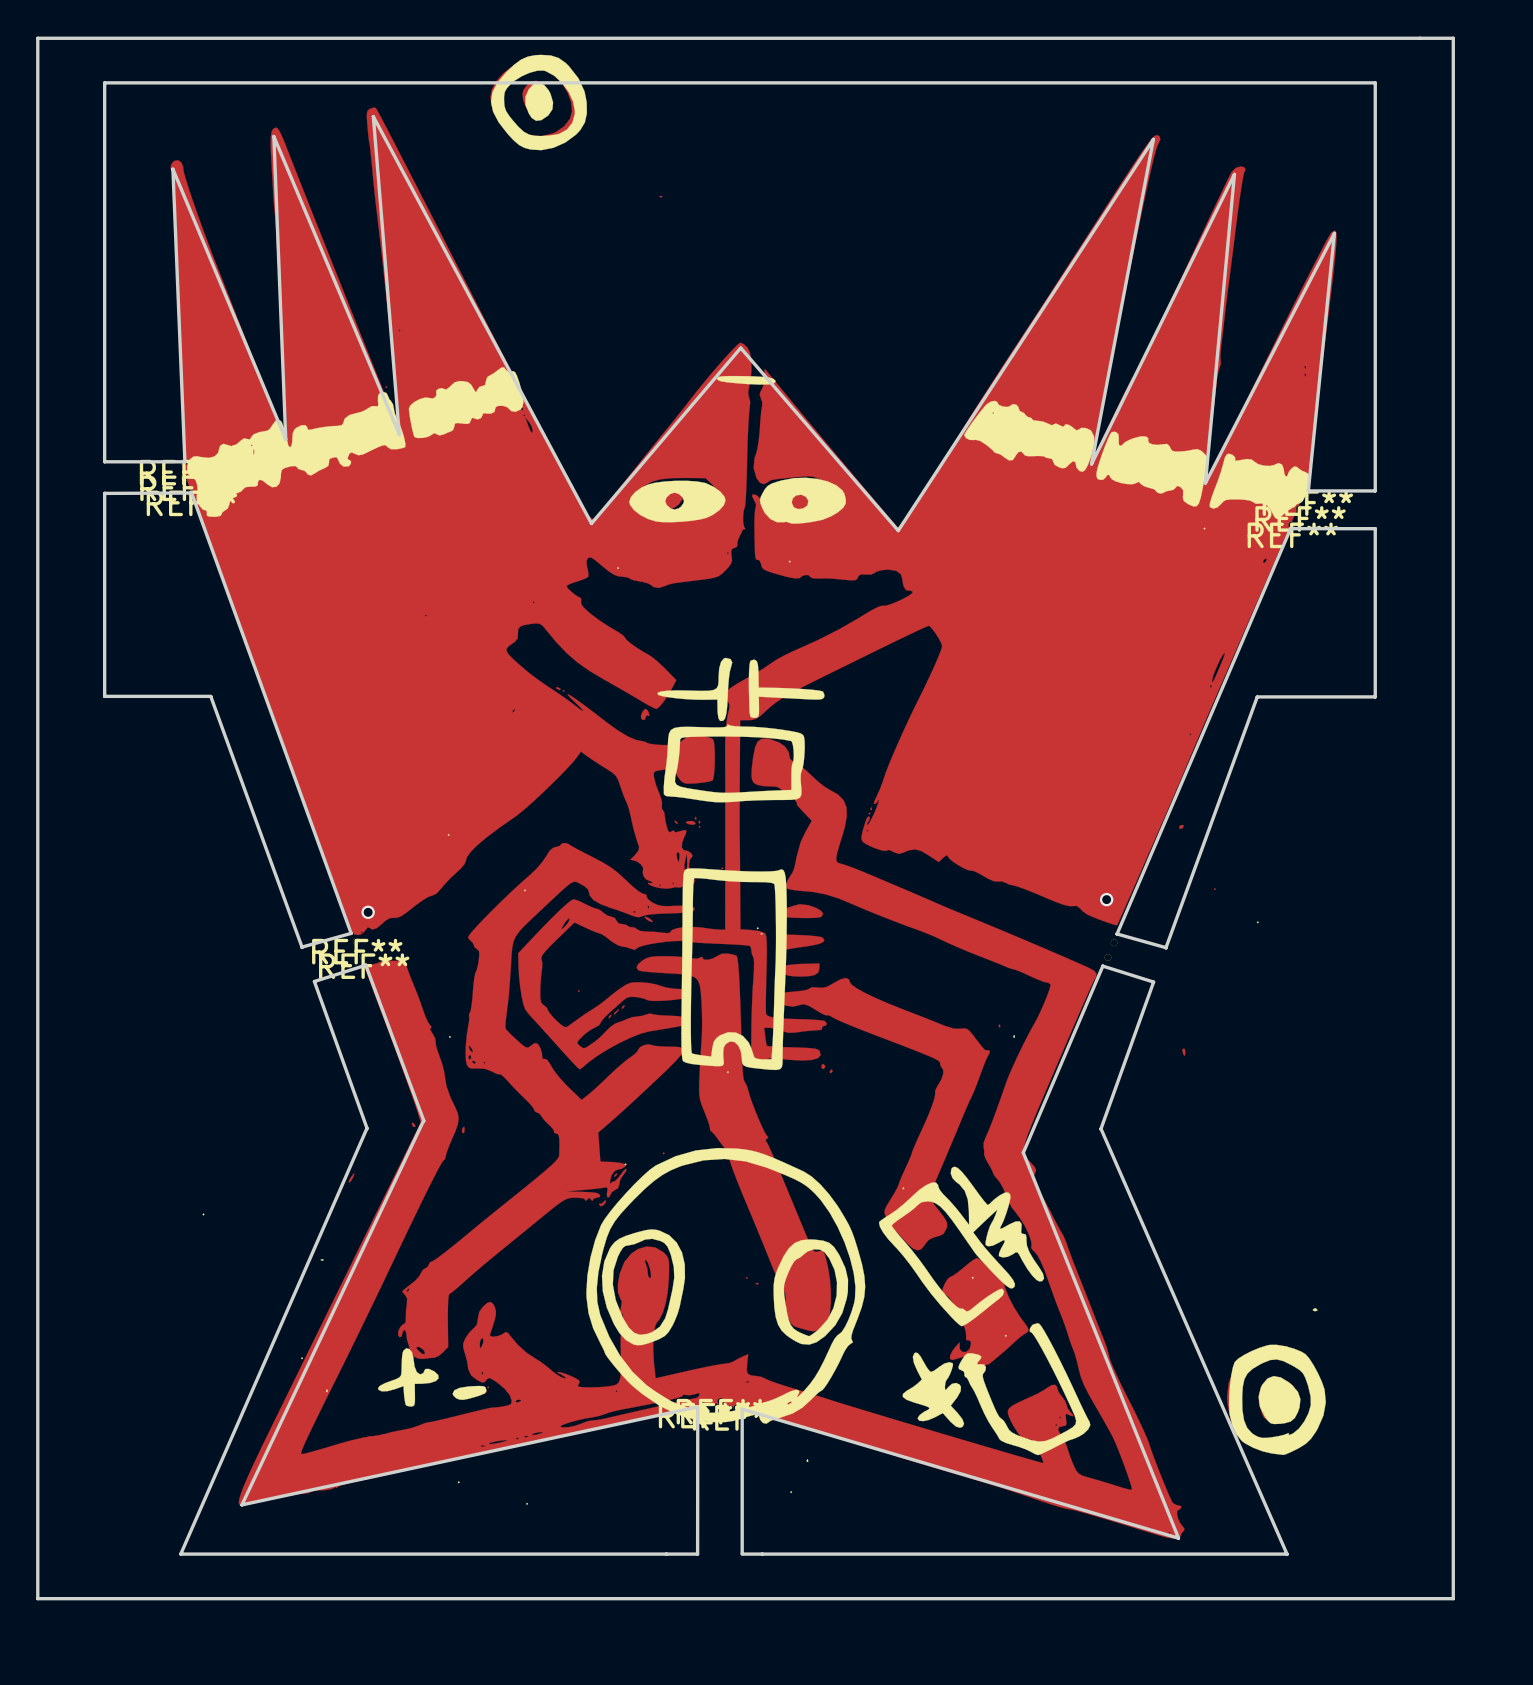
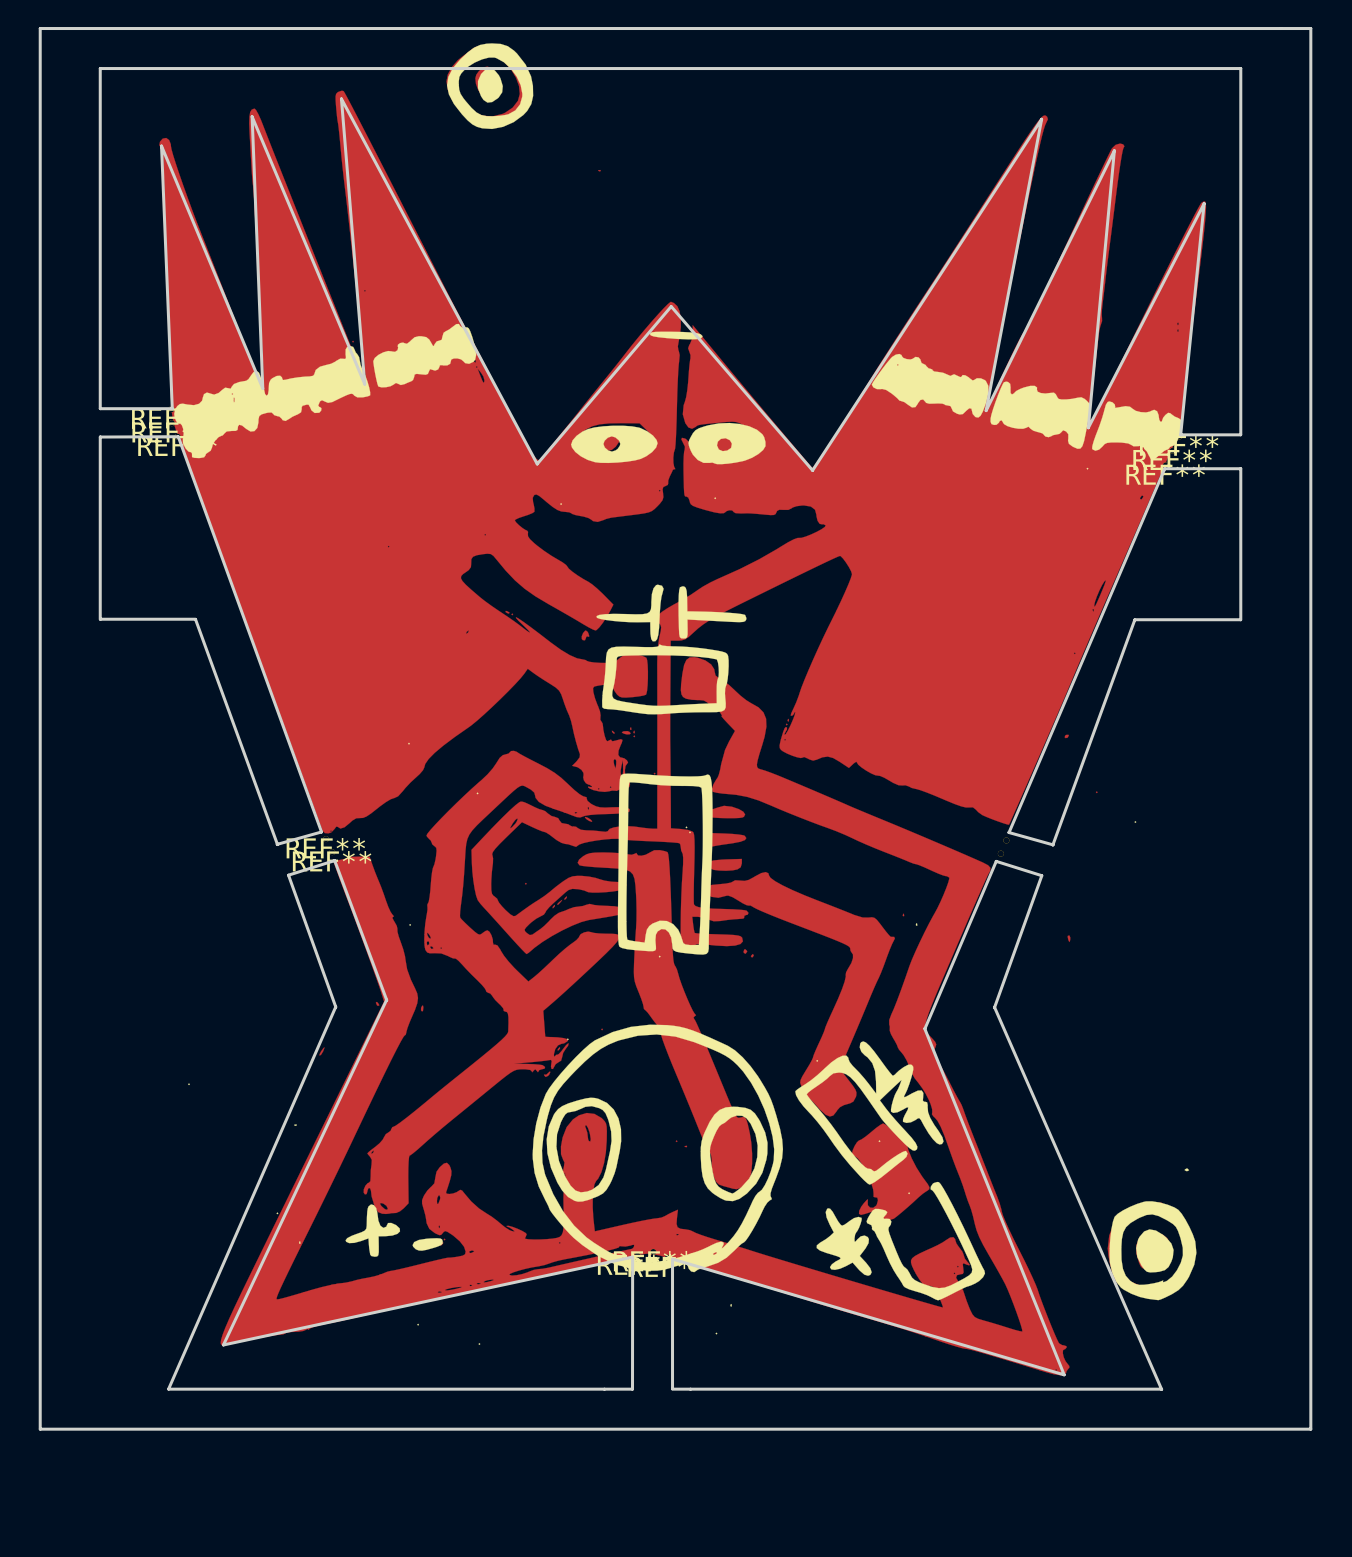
via: (1106, 899) -> none
via: (368, 912) -> none

